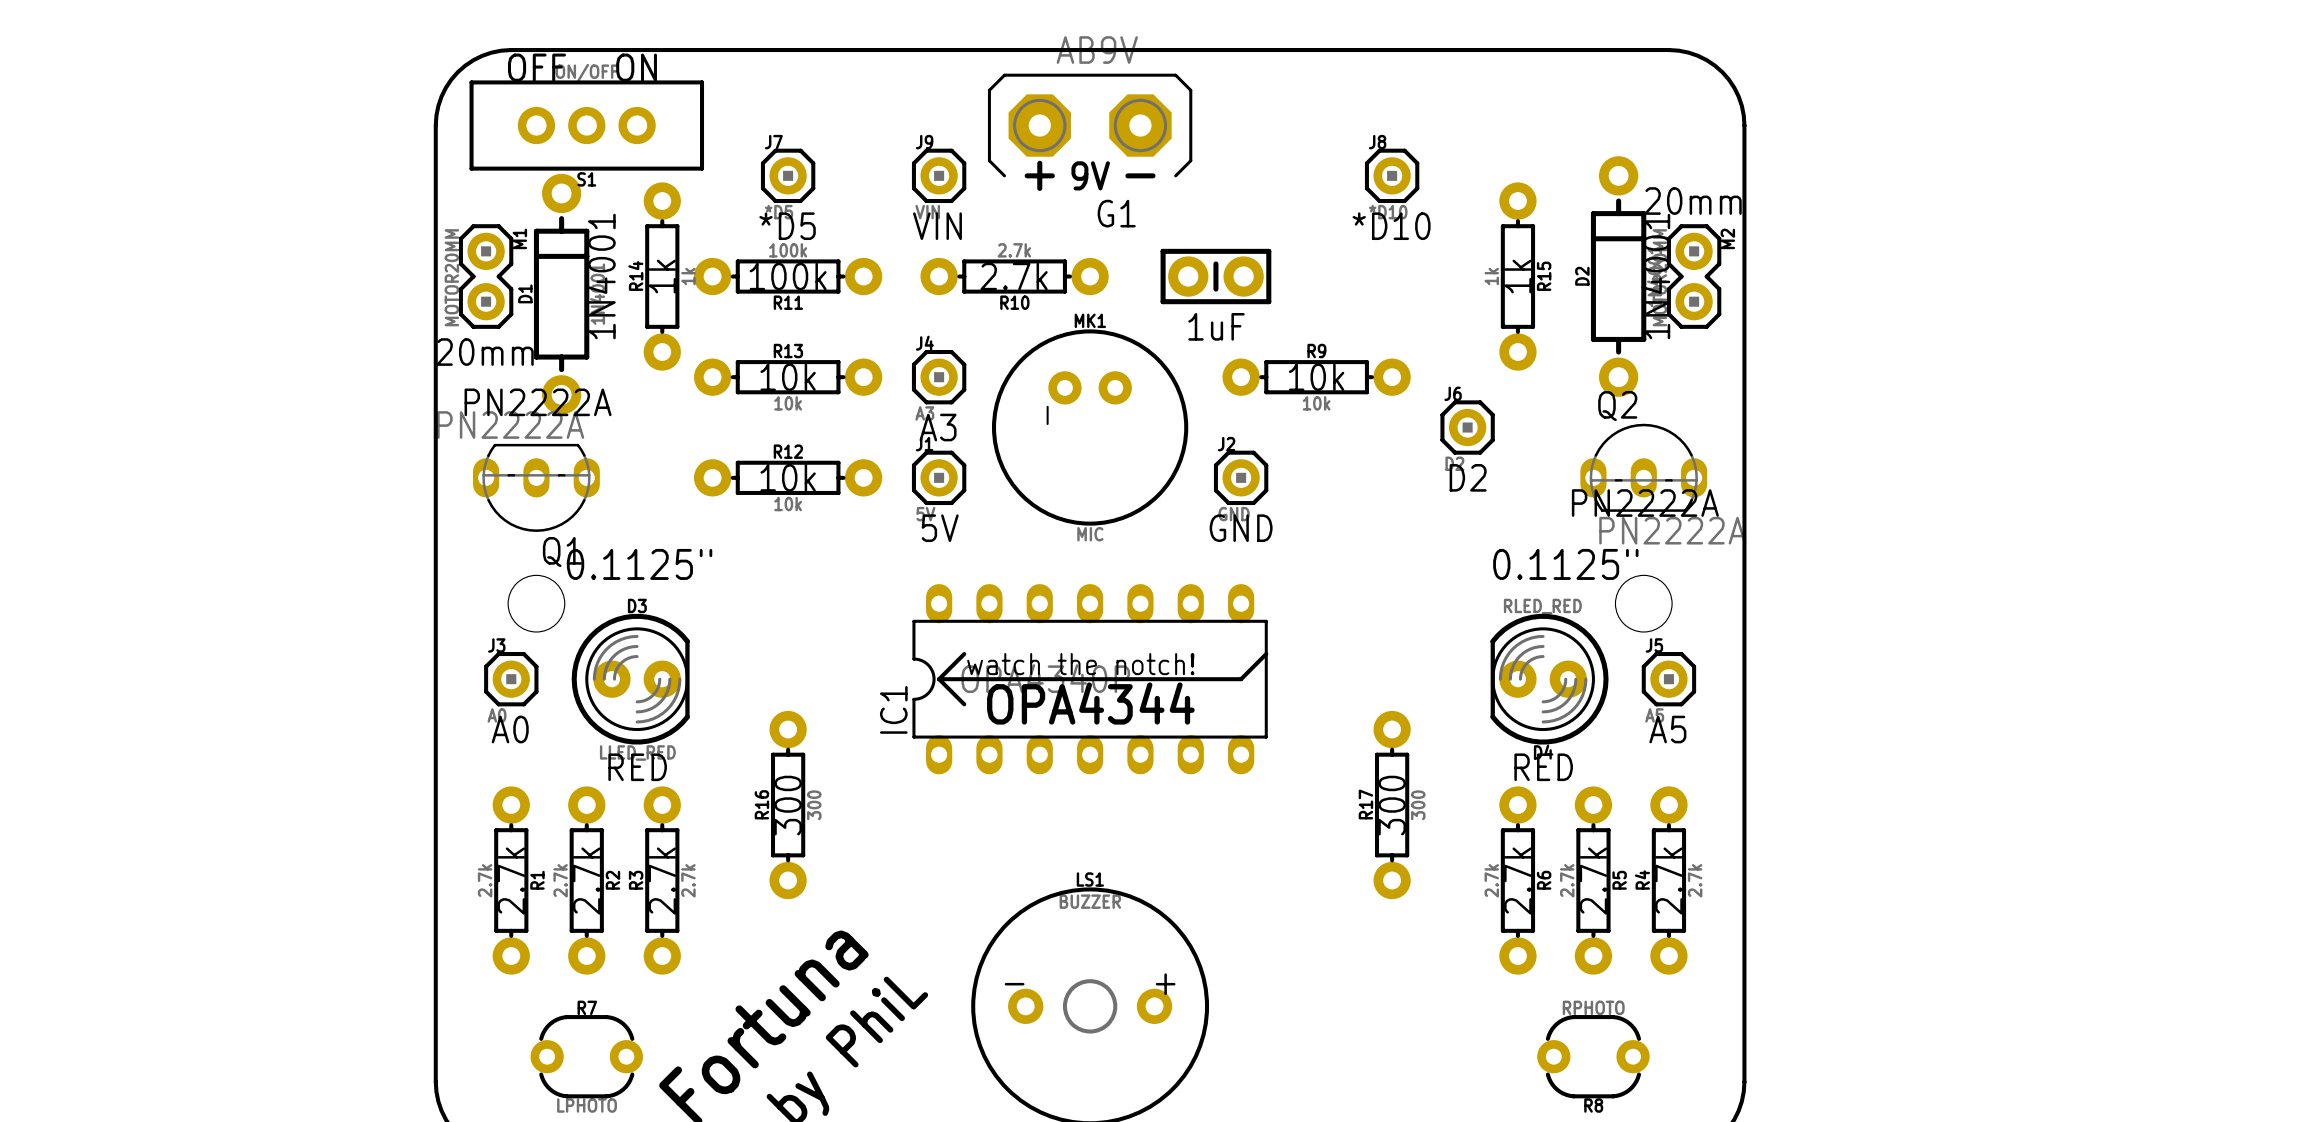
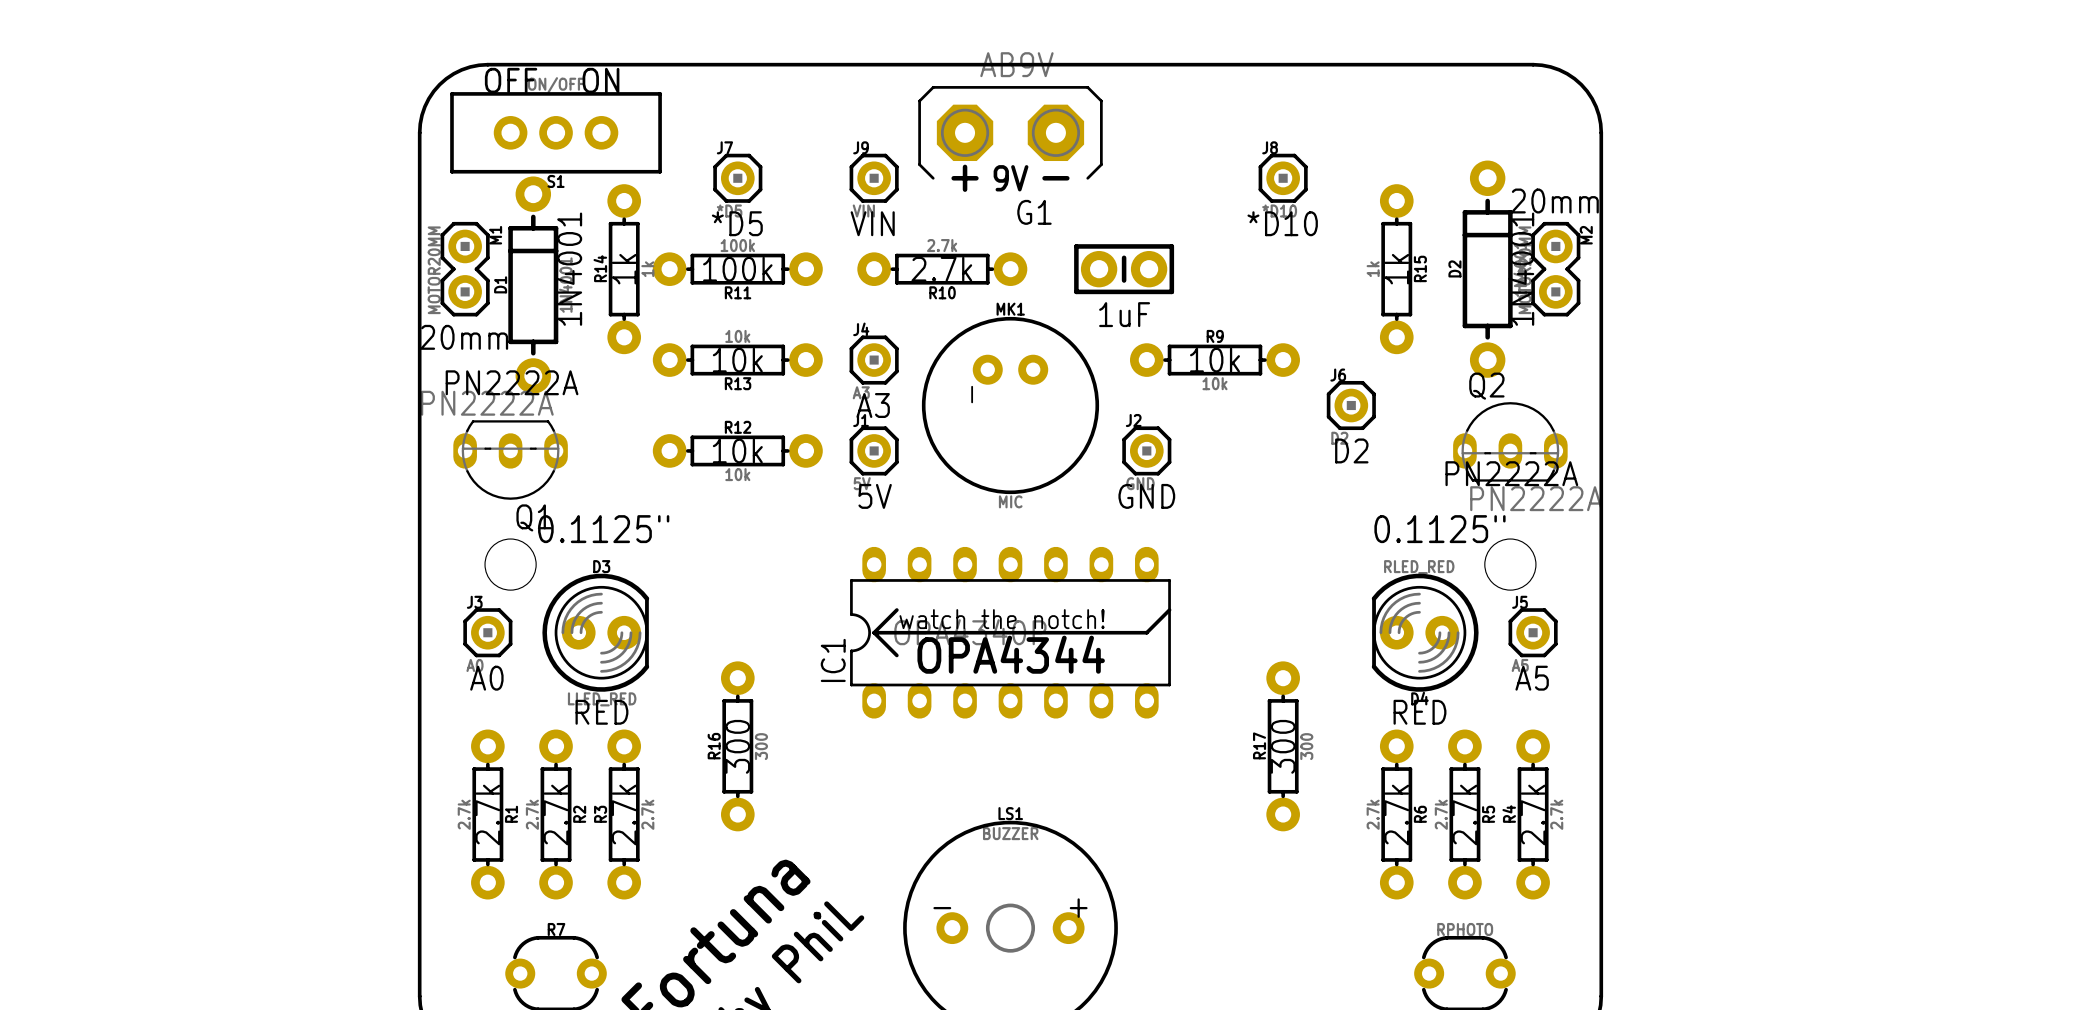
R13 name position: R13 (788, 351) -> R13 (738, 383)
R13 value position: 10k (788, 403) -> 10k (737, 336)

